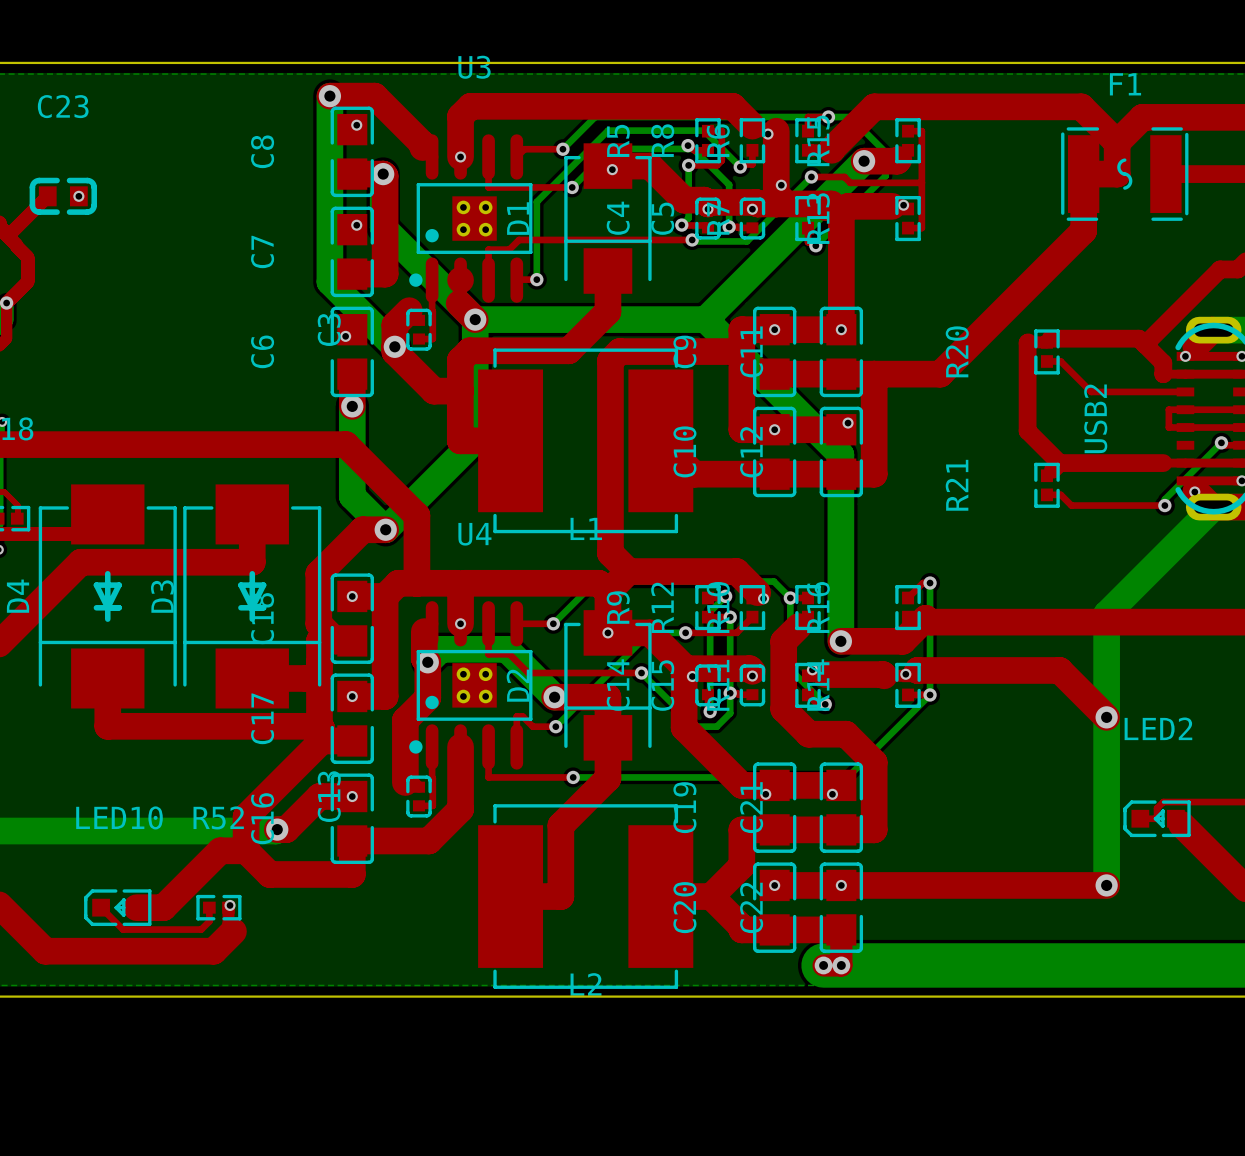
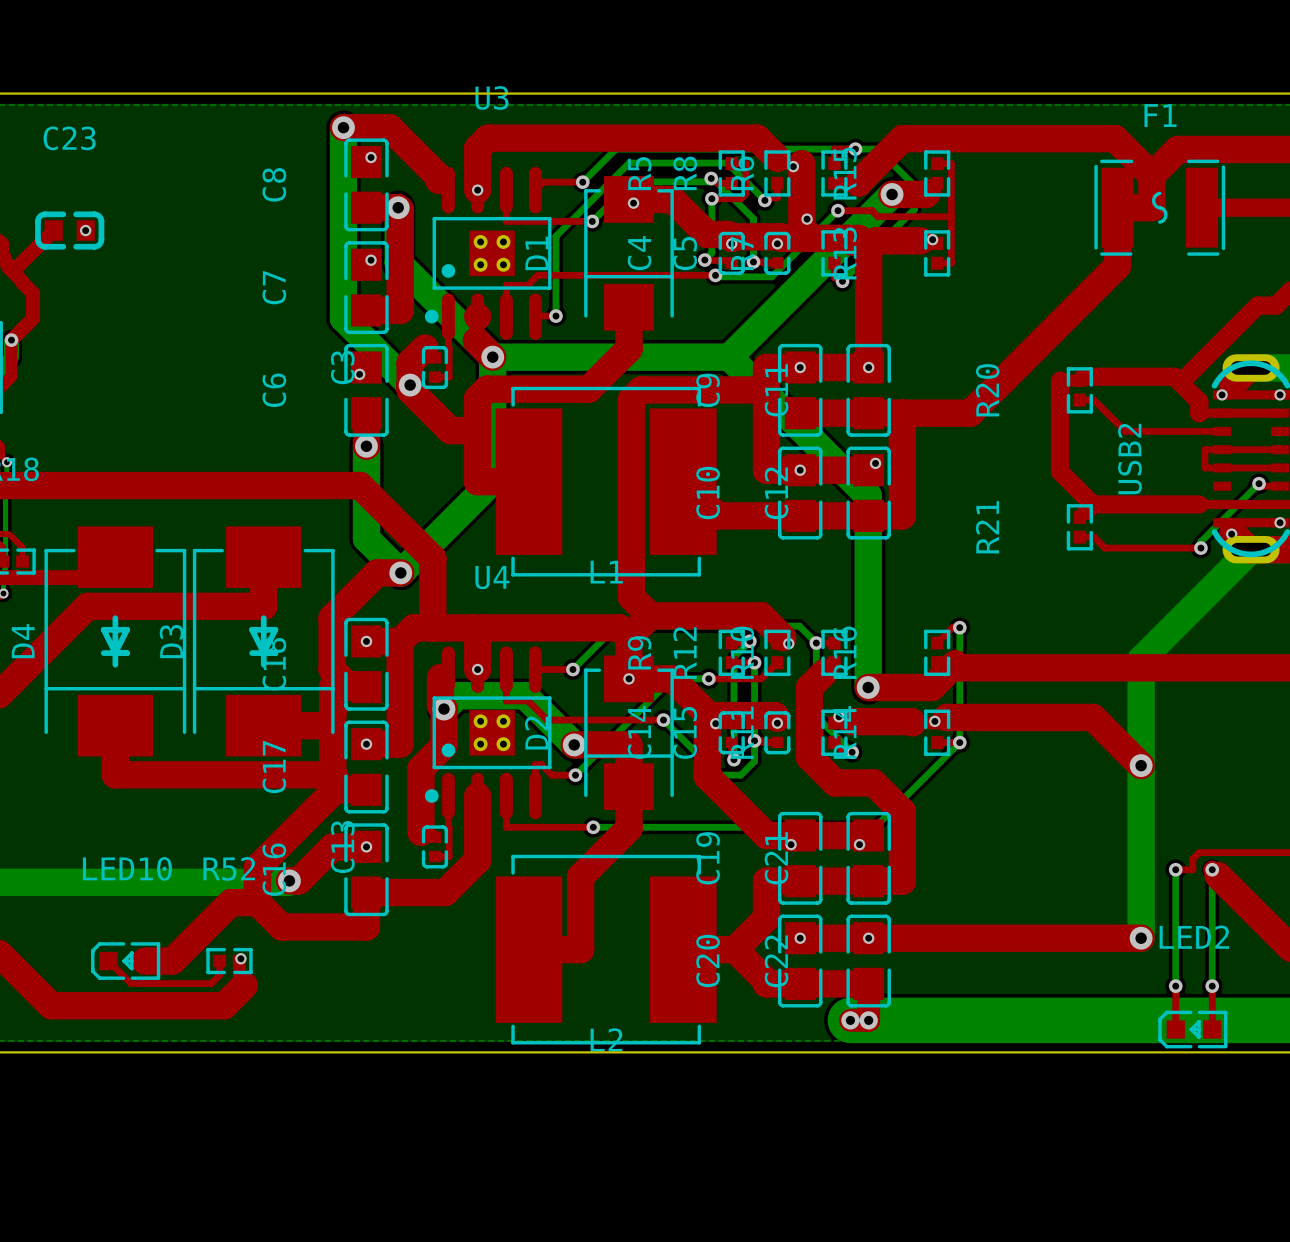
bottom track: none -> (1175, 869) (1175, 986)
via: none -> (1175, 869)
LED2 position: (1157, 818) -> (1192, 1029)
bottom track: none -> (1212, 869) (1212, 986)
via: none -> (1212, 869)
top track: none -> (1175, 986) (1175, 1029)
via: none -> (1175, 986)
top track: none -> (1212, 986) (1212, 1029)
via: none -> (1212, 986)

